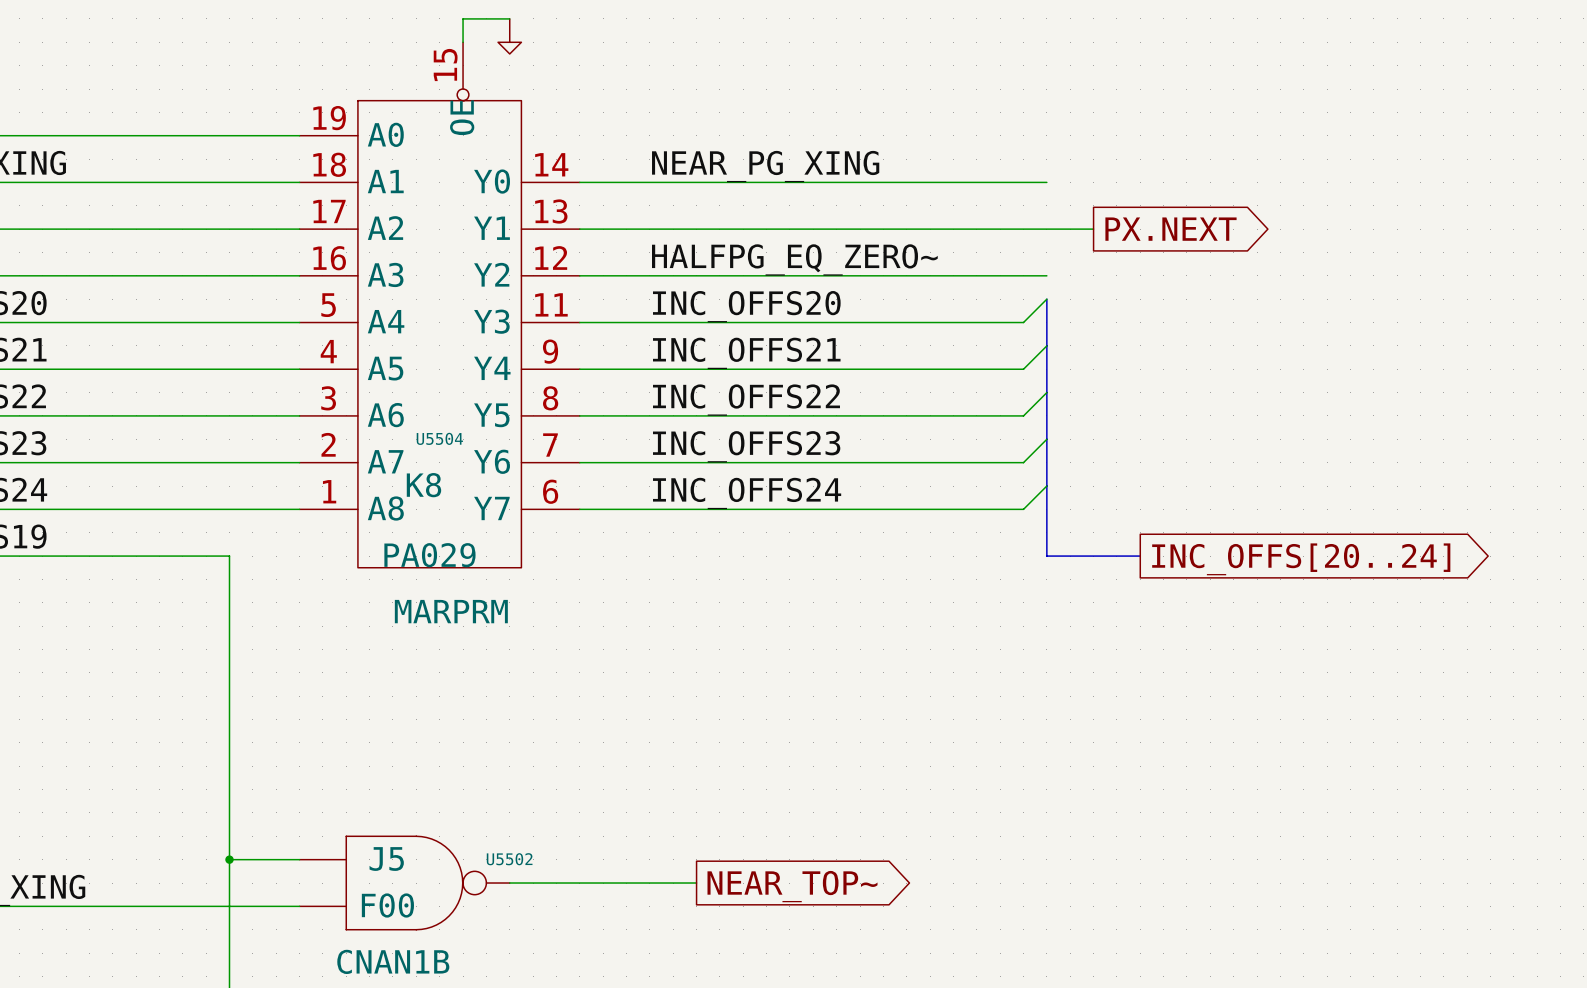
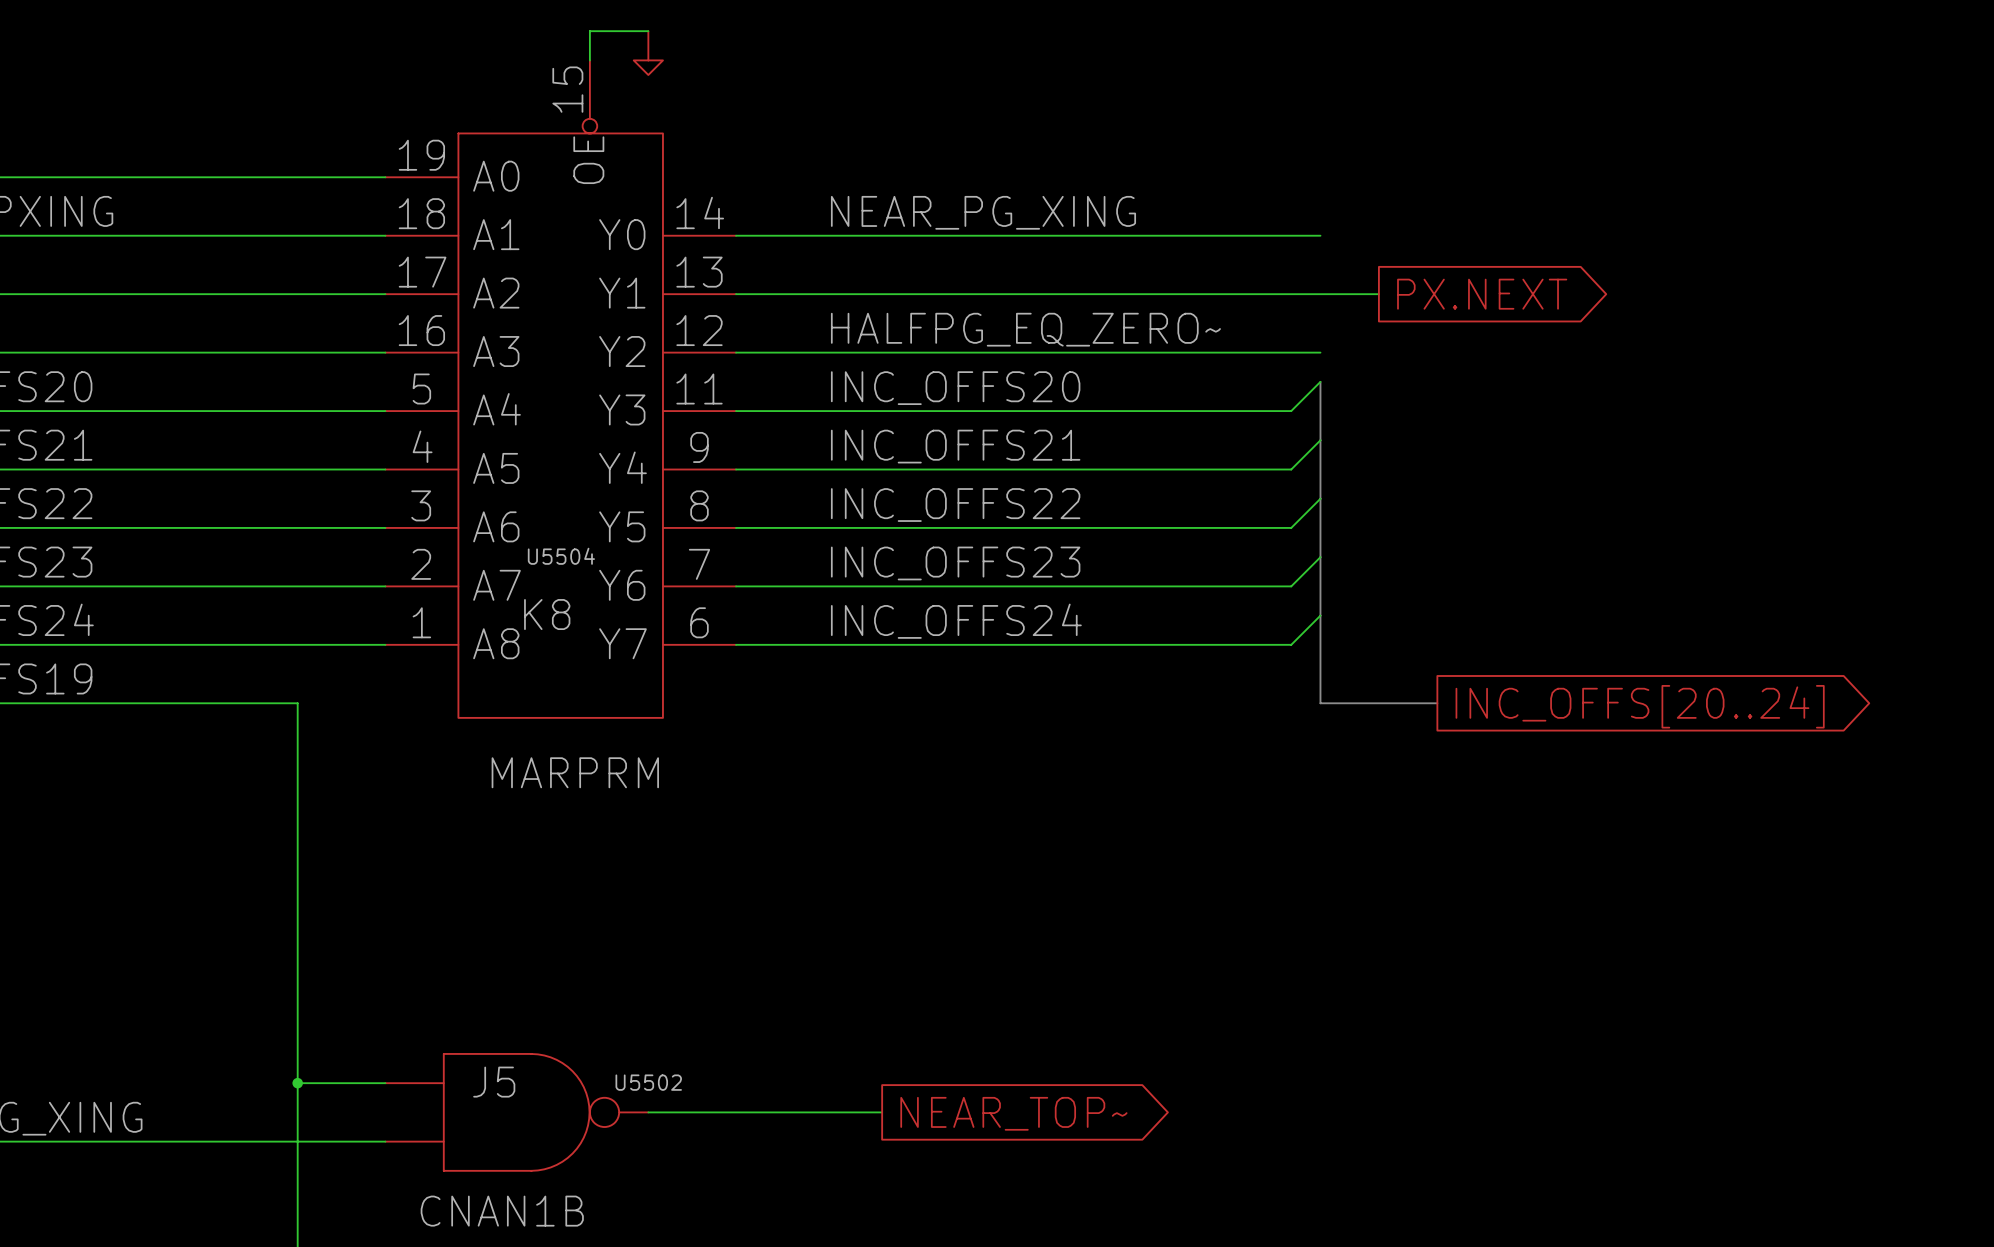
U5504 value: PA029 (429, 555) -> none
U5502 value: F00 (387, 905) -> none

